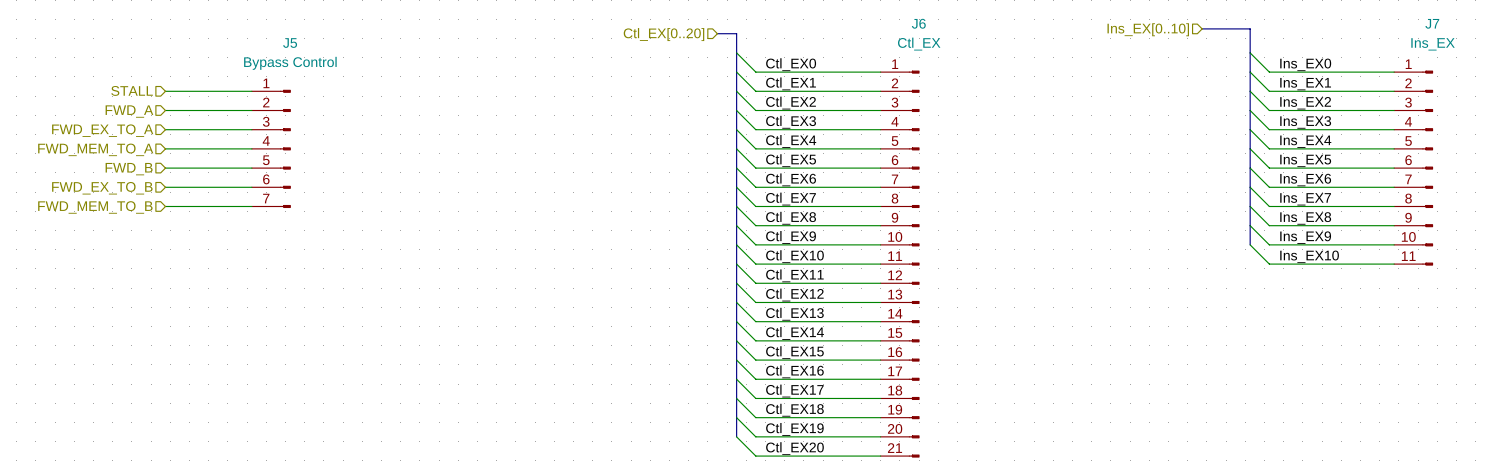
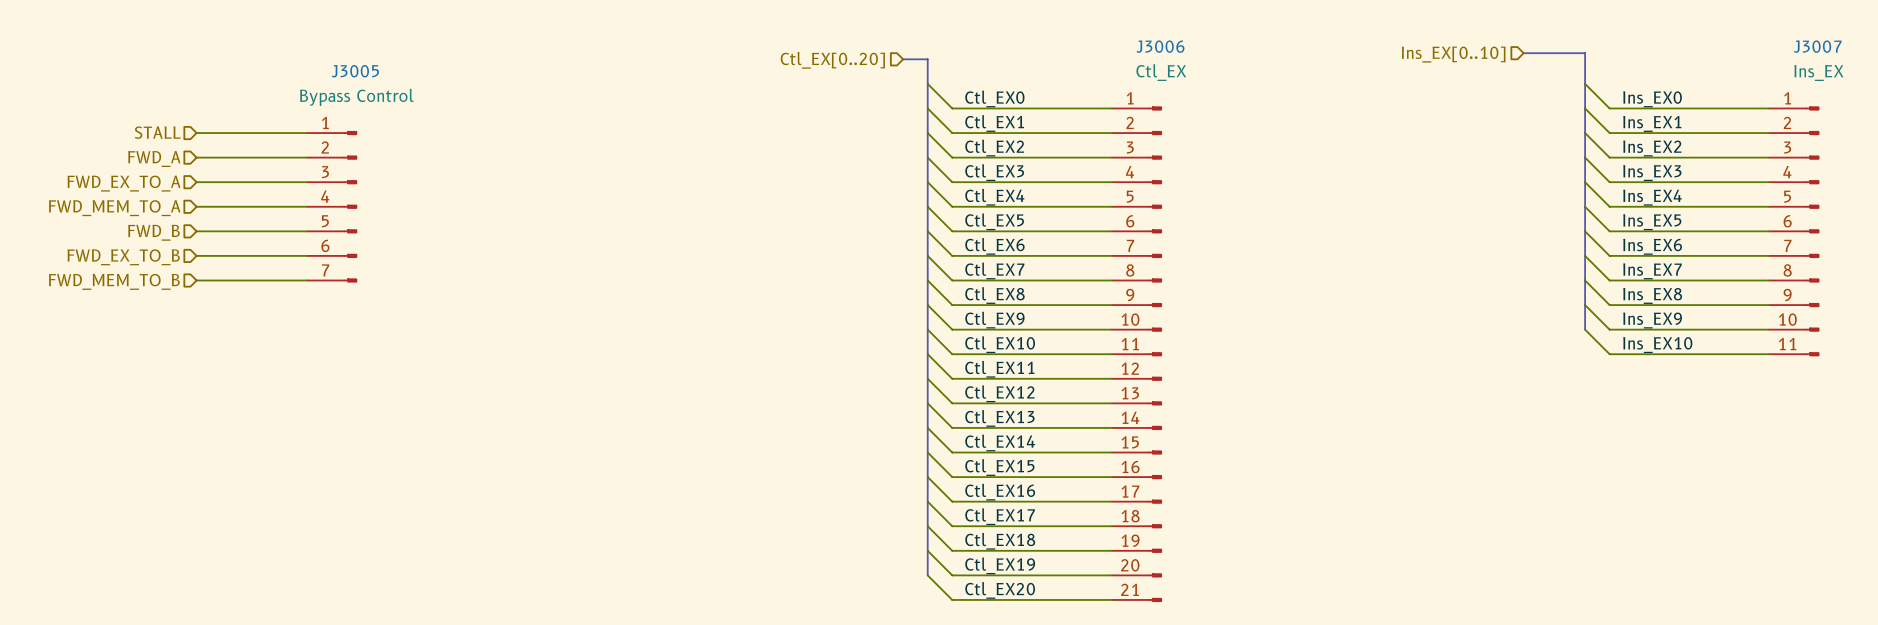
J6 name: J6 (918, 23) -> J3006 (1160, 46)
J7 name: J7 (1432, 23) -> J3007 (1817, 46)
J5 name: J5 (290, 43) -> J3005 (355, 71)

